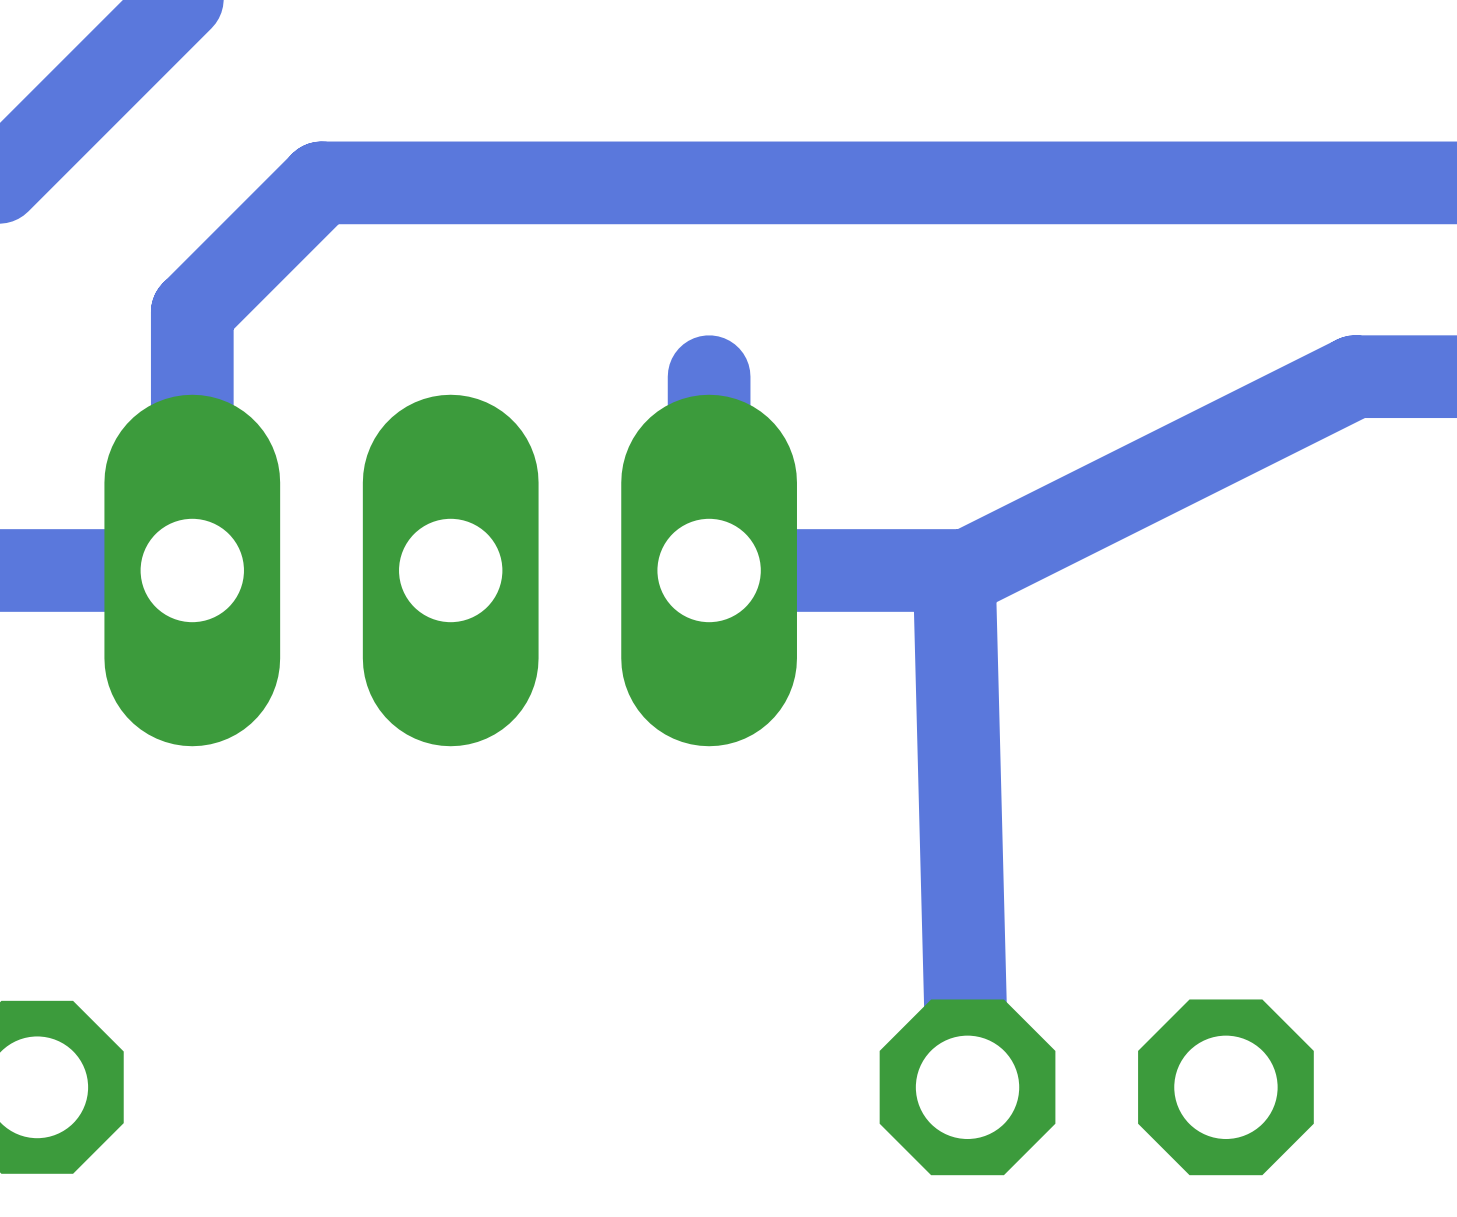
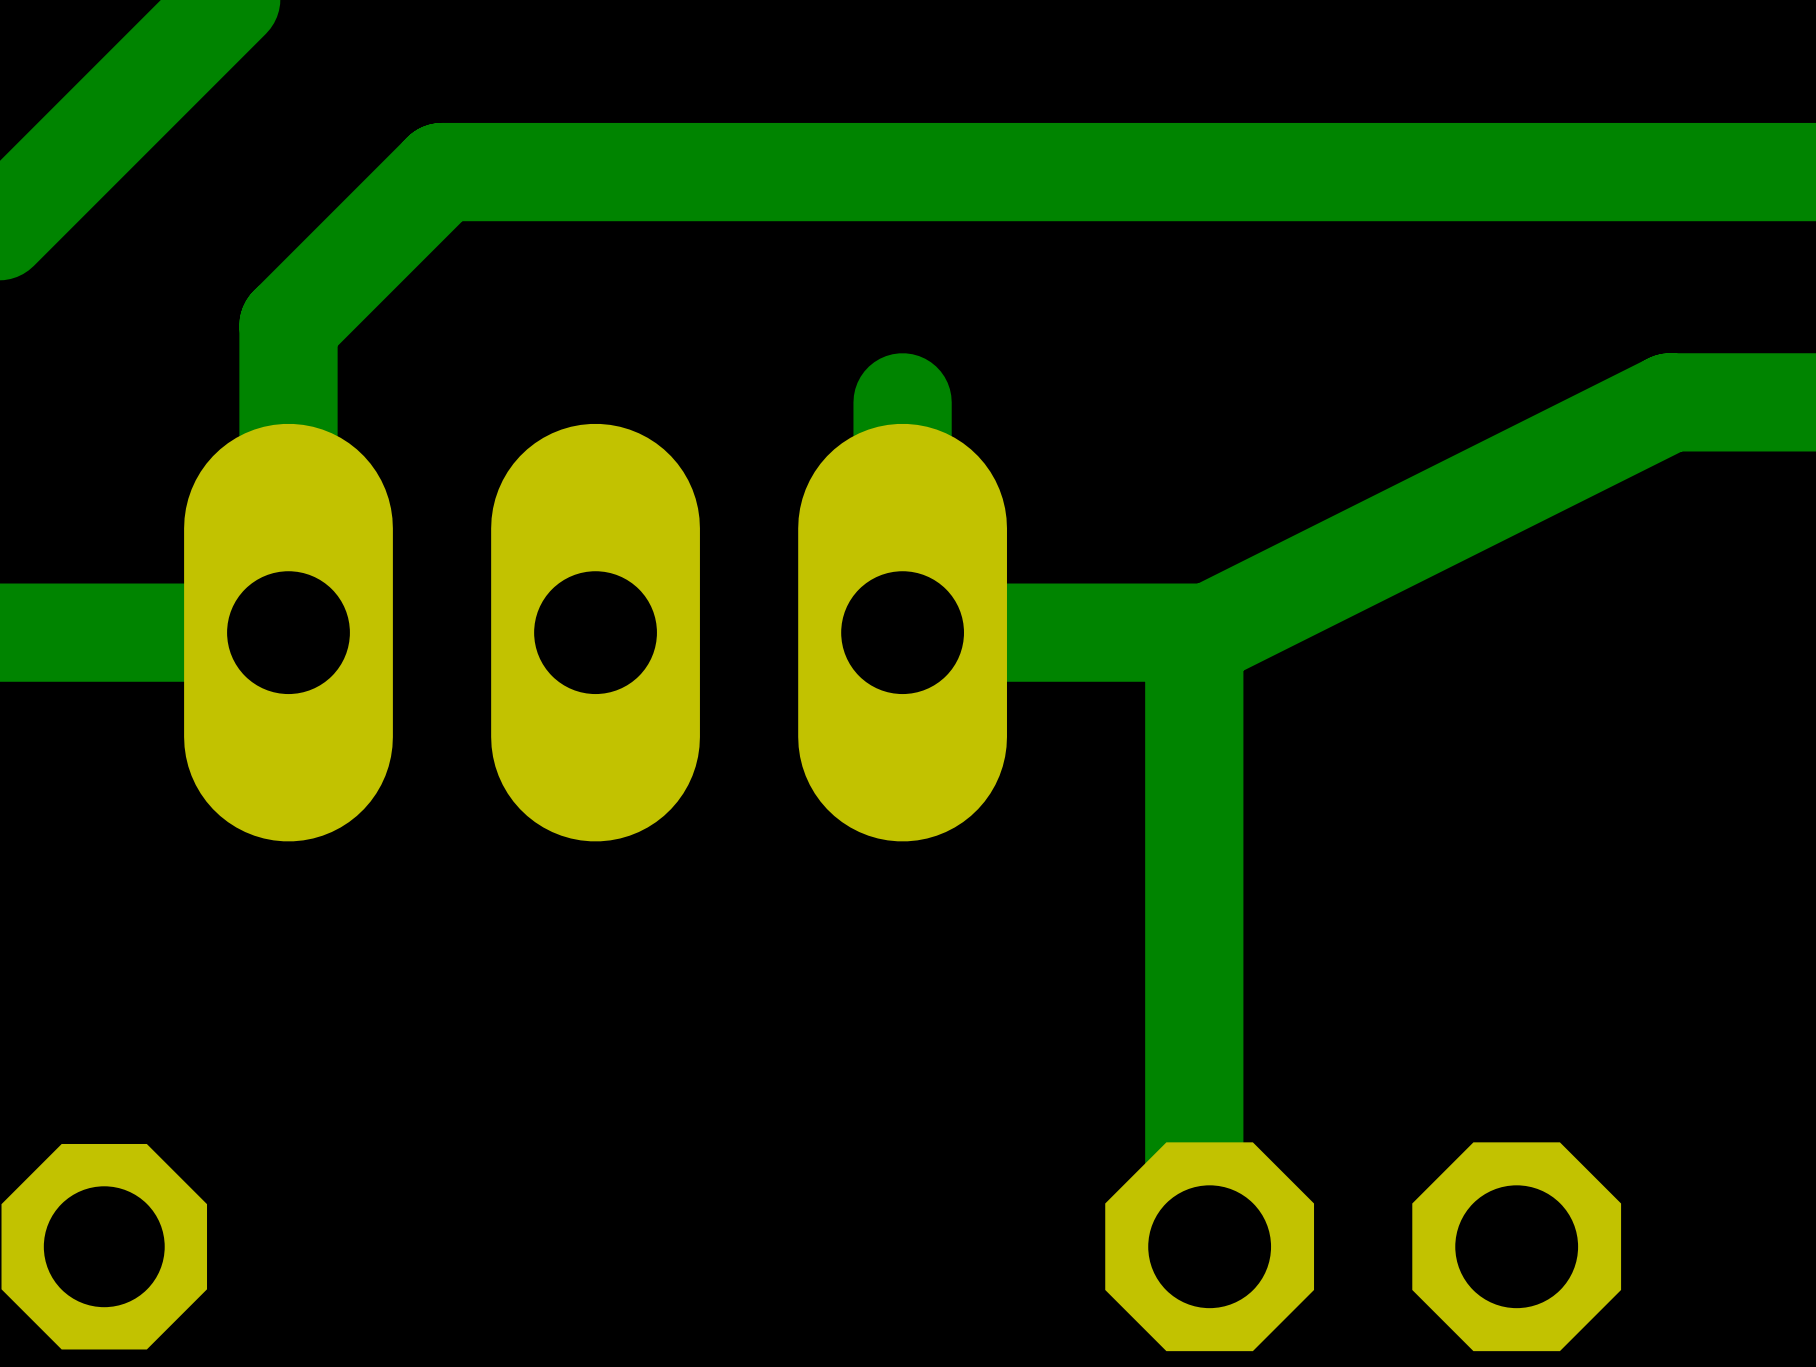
bottom track: (954, 583) (967, 1087) -> (1194, 647) (1194, 1246)

